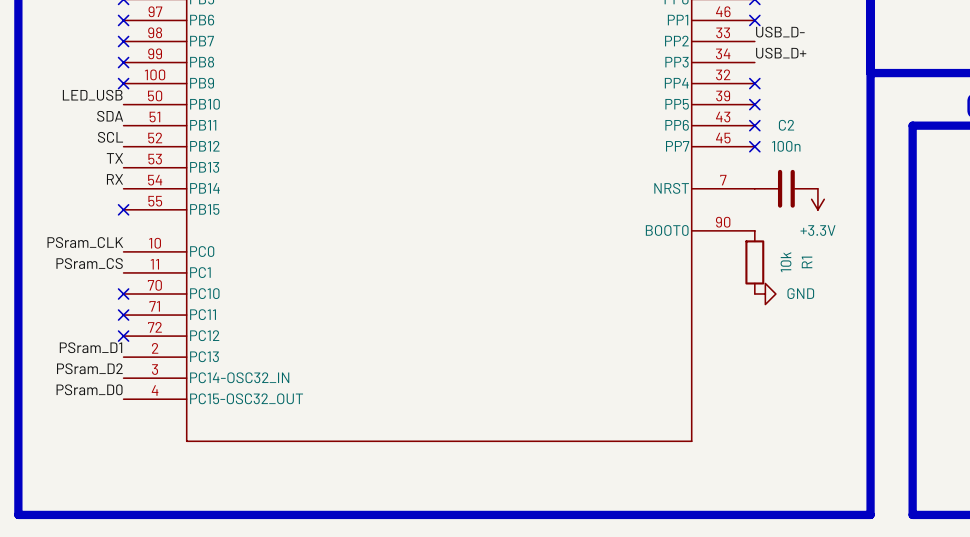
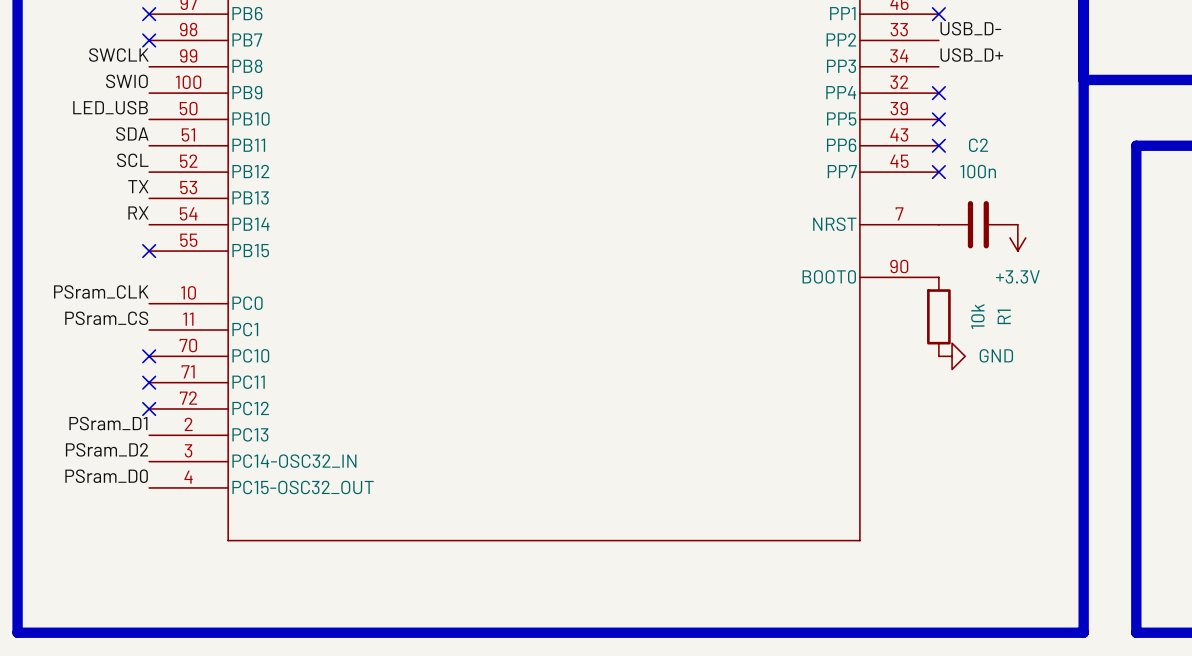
label: none -> SWCLK (118, 55)
no-connect mark: (123, 62) -> none
label: none -> SWIO (126, 81)
no-connect mark: (123, 83) -> none

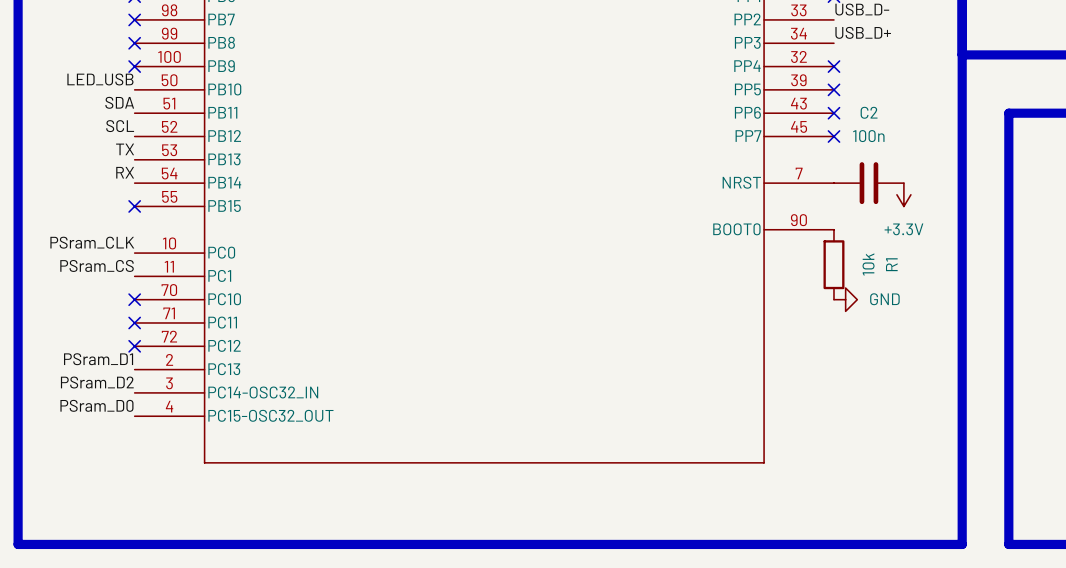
label: SWCLK (118, 55) -> none
no-connect mark: none -> (134, 43)
label: SWIO (126, 81) -> none
no-connect mark: none -> (134, 66)

